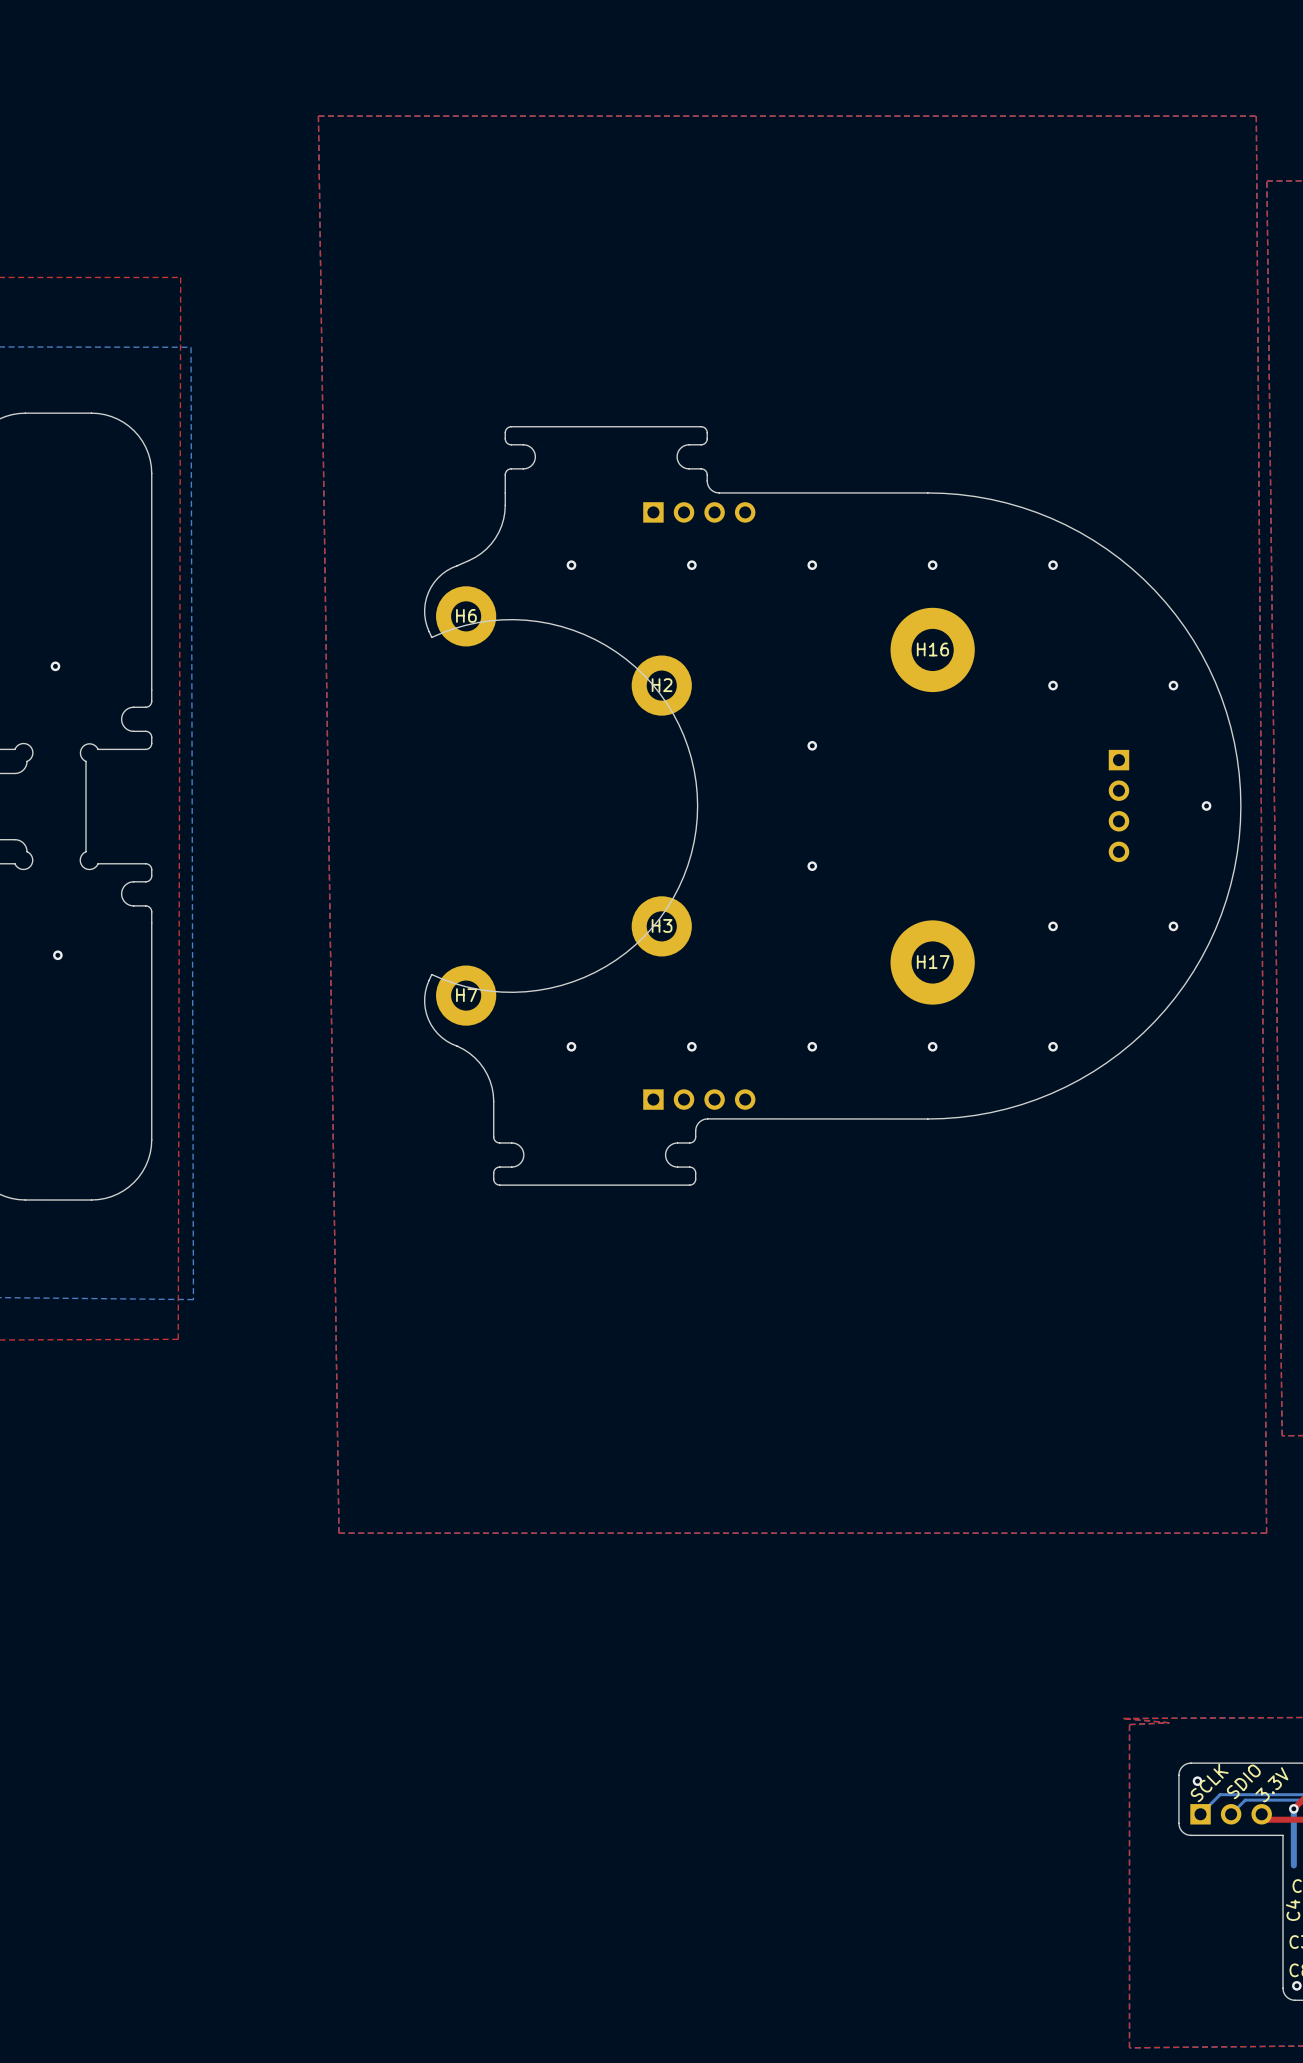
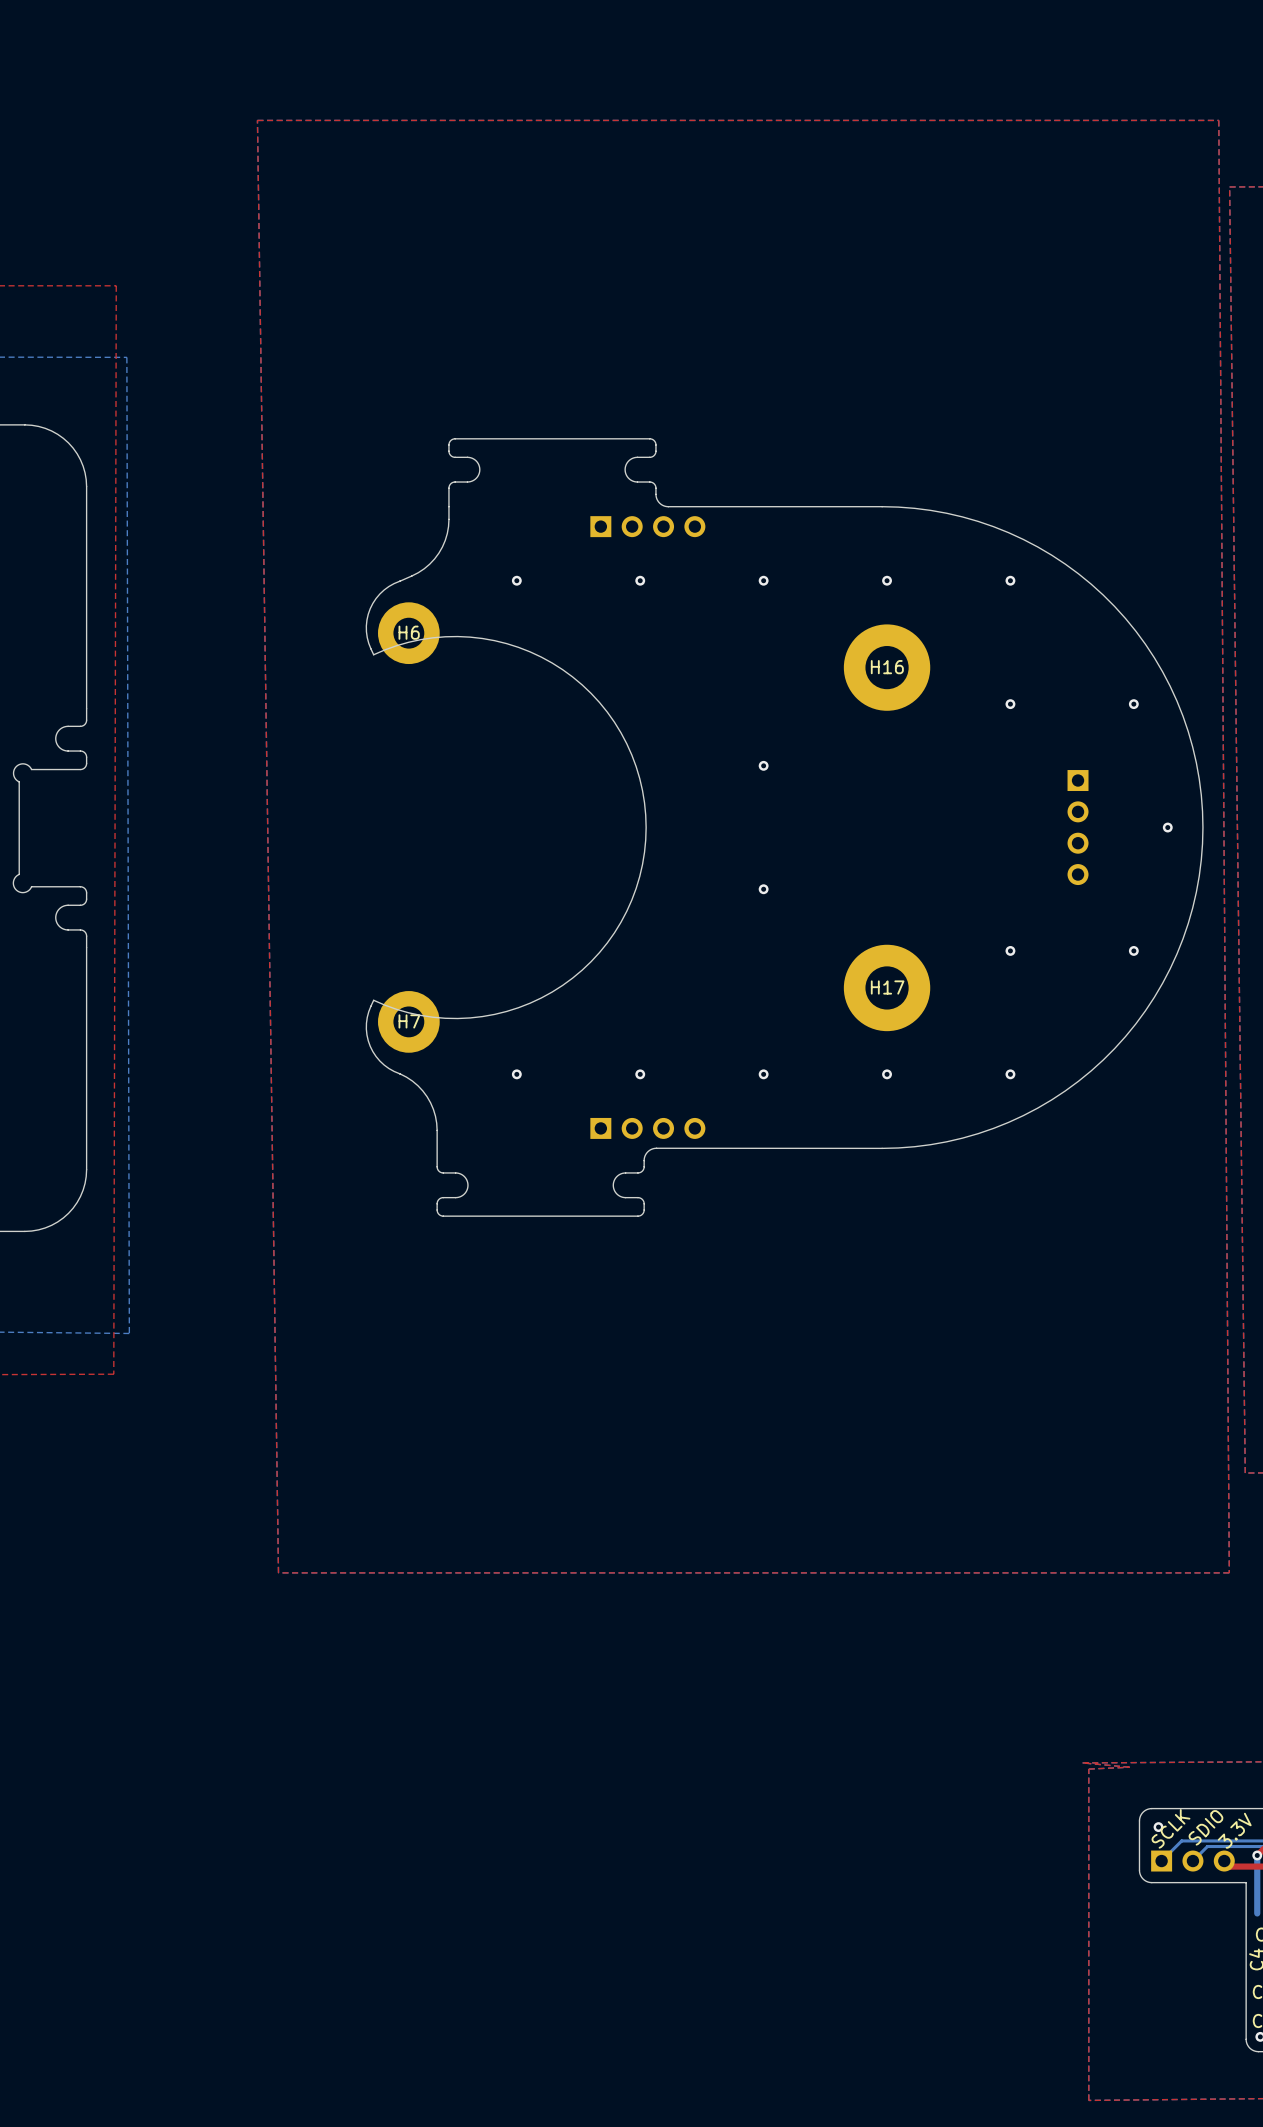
H2: (661, 685) -> none
H3: (661, 926) -> none

